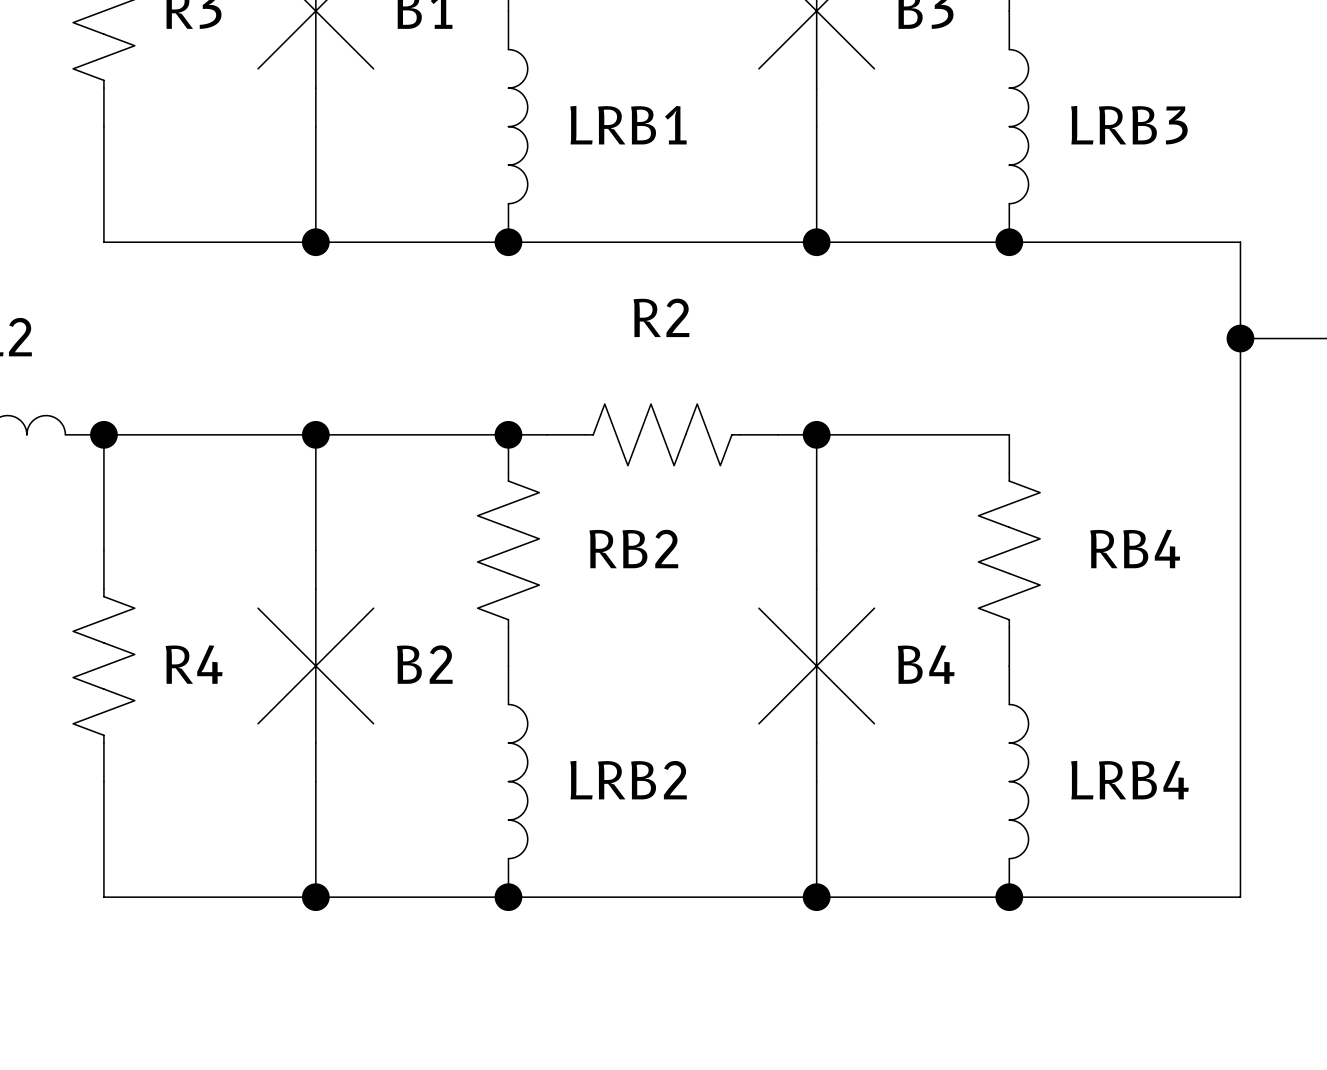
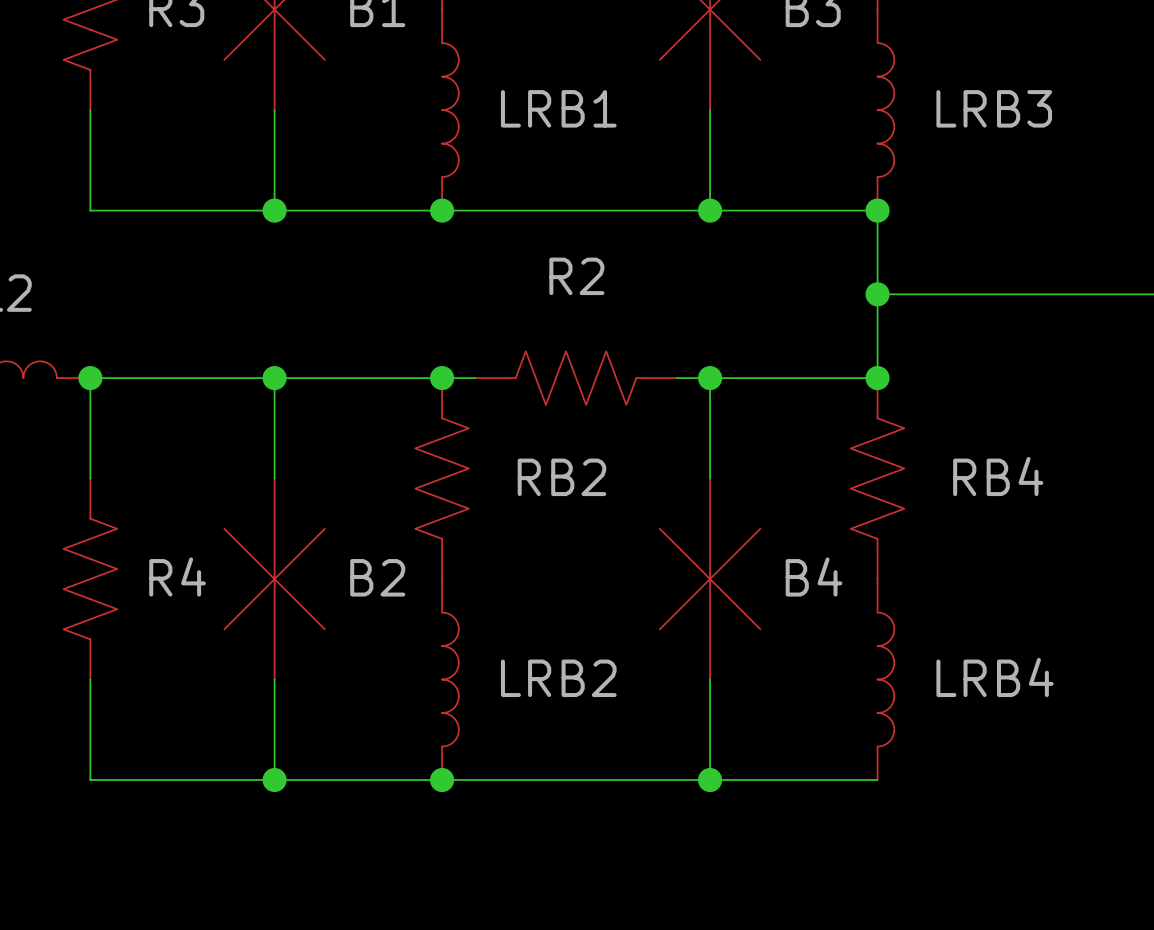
wire: (1009, 242) (1240, 242) (1240, 897) (1009, 897) -> (877, 210) (877, 378)
wire: none -> (877, 294) (1078, 294)
junction: none -> (877, 294)
junction: (1240, 338) -> none
junction: none -> (877, 378)
junction: (1009, 897) -> none

